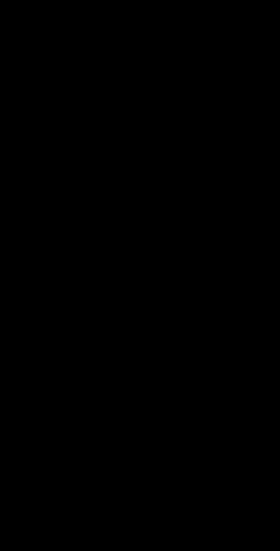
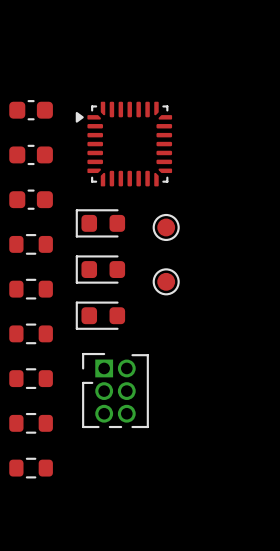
part: none -> (31, 110)
part: none -> (123, 144)
part: none -> (31, 154)
part: none -> (31, 199)
part: none -> (100, 223)
part: none -> (166, 227)
part: none -> (31, 244)
part: none -> (100, 269)
part: none -> (166, 281)
part: none -> (31, 289)
part: none -> (100, 315)
part: none -> (31, 333)
part: none -> (31, 378)
part: none -> (115, 390)
part: none -> (31, 423)
part: none -> (31, 468)

